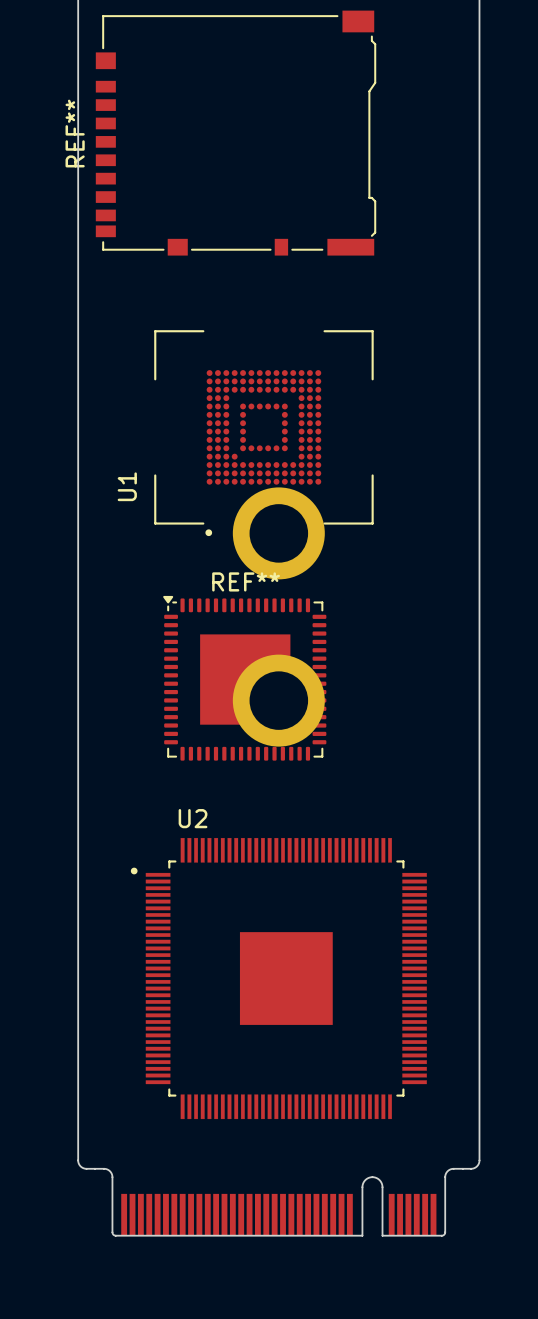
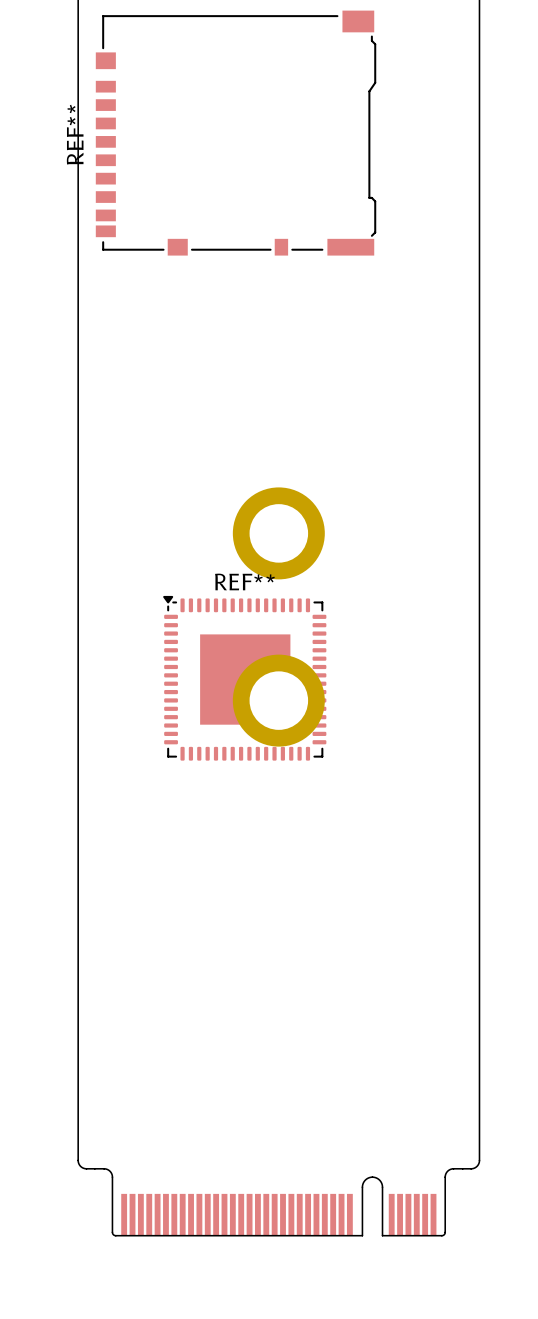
U1: (263, 433) -> none
U2: (278, 978) -> none

